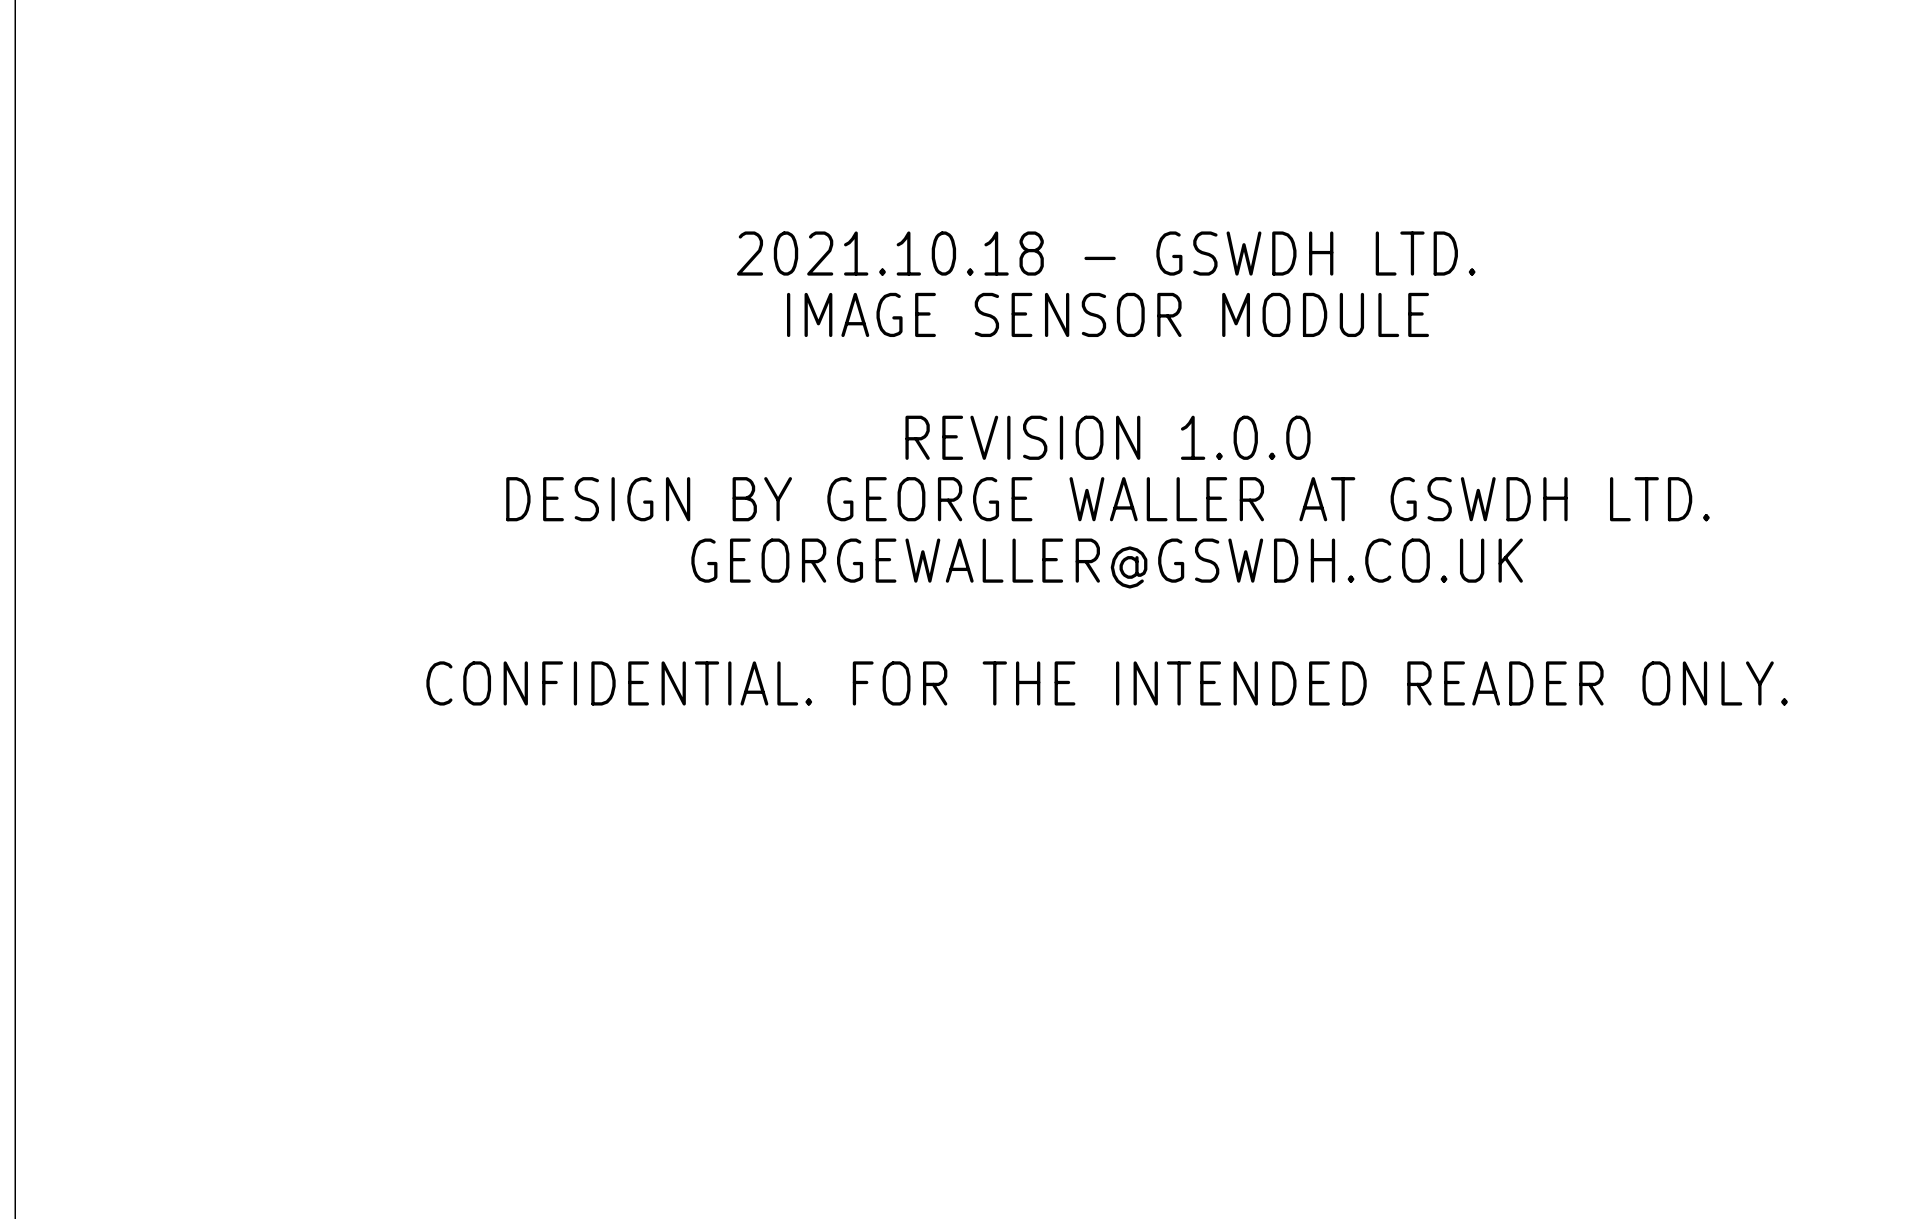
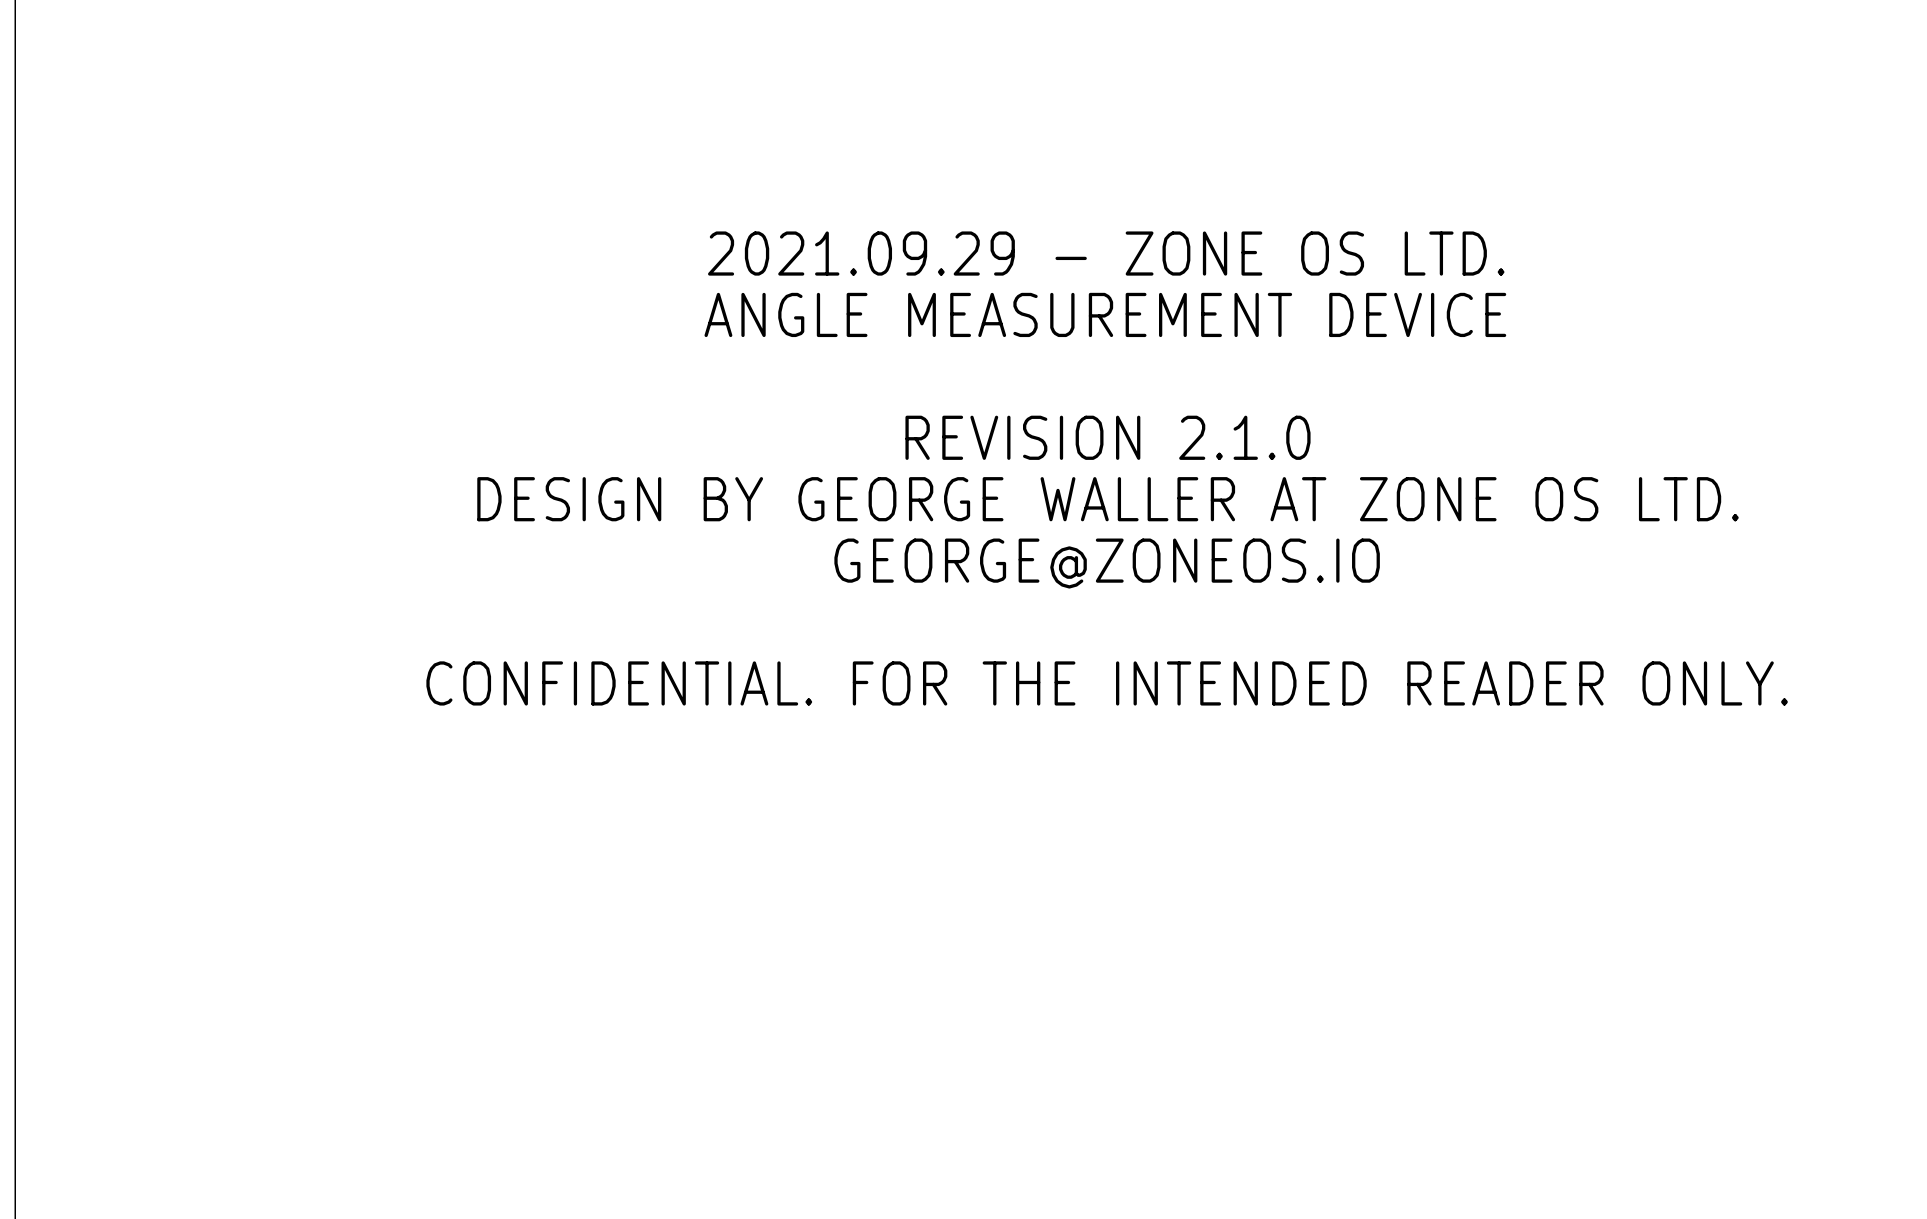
text: 2021.10.18 - GSWDH LTD. (1106, 253) -> 2021.09.29 - ZONE OS LTD. (1106, 253)
text: IMAGE SENSOR MODULE (1107, 314) -> ANGLE MEASUREMENT DEVICE (1105, 314)
text: REVISION 1.0.0 (1107, 437) -> REVISION 2.1.0 (1107, 437)
text: DESIGN BY GEORGE WALLER AT GSWDH LTD. (1107, 499) -> DESIGN BY GEORGE WALLER AT ZONE OS LTD. (1107, 499)
text: GEORGEWALLER@GSWDH.CO.UK (1107, 563) -> GEORGE@ZONEOS.IO (1107, 563)

